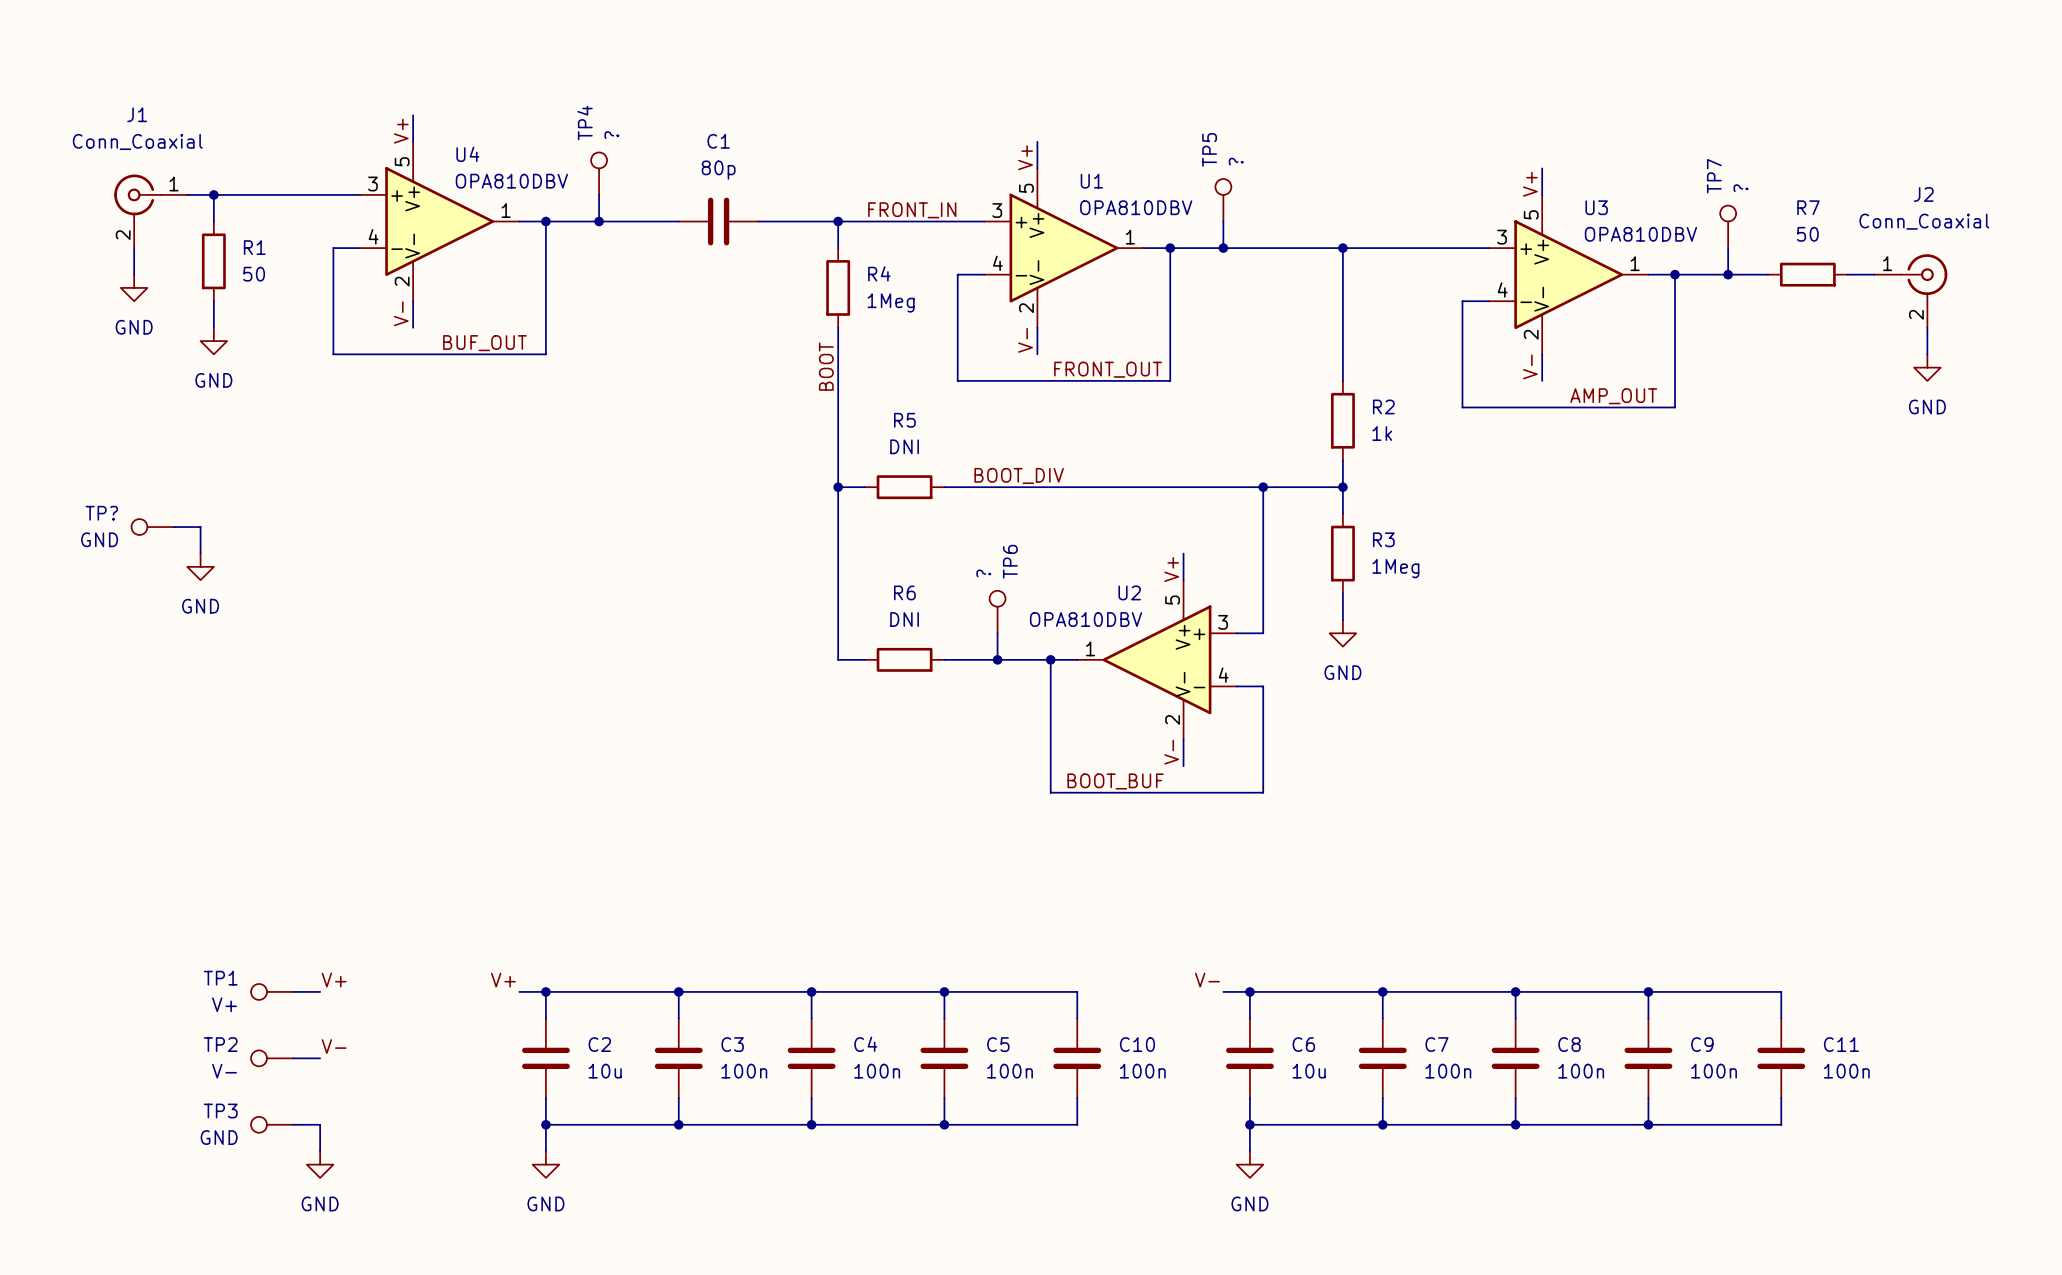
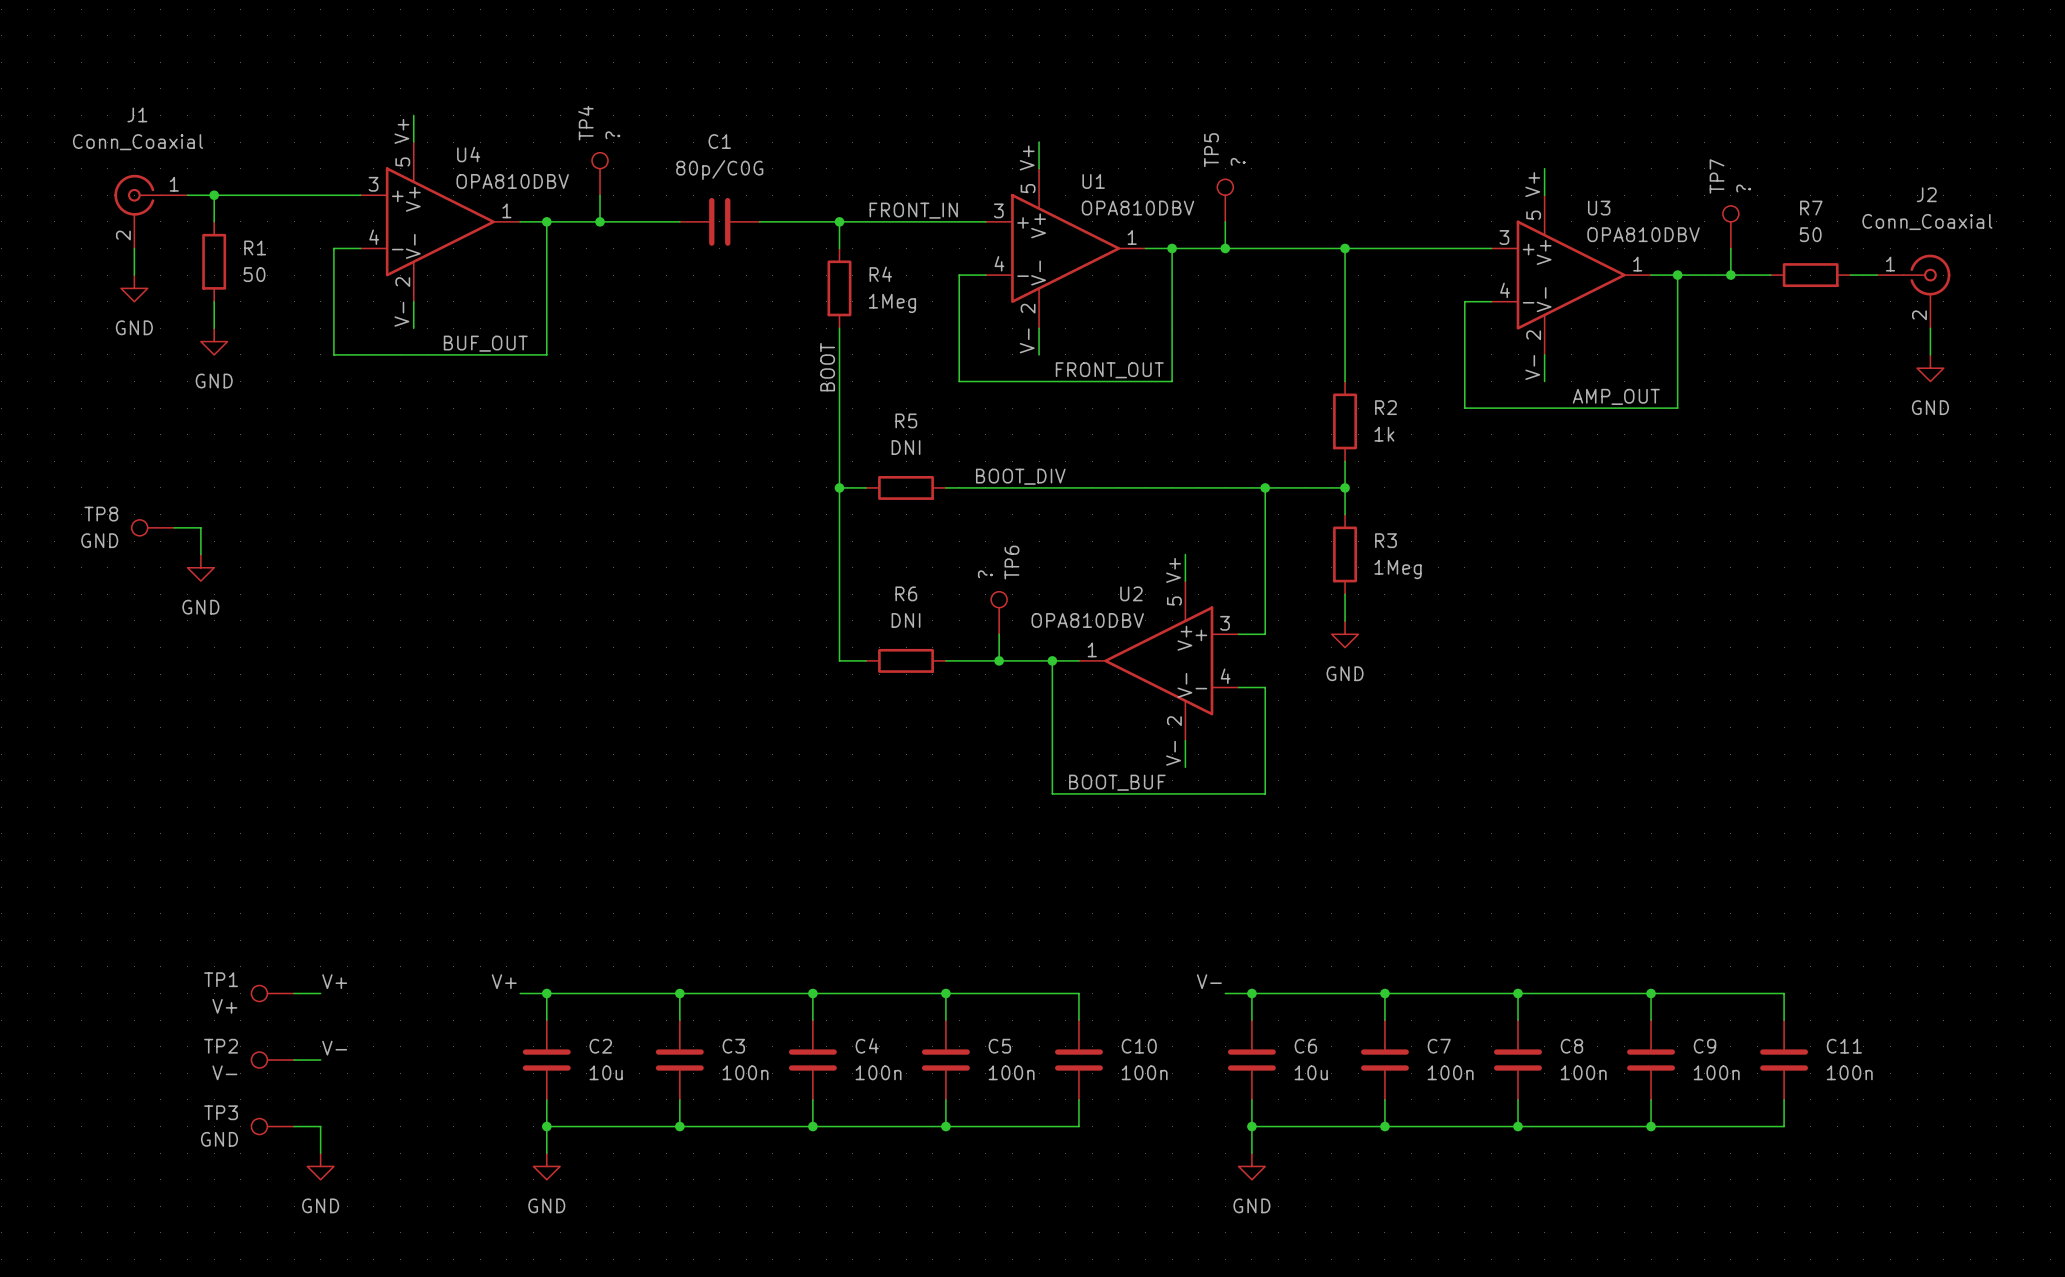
C1 value: 80p (718, 170) -> 80p/C0G (719, 170)
TP? name: TP? (101, 513) -> TP8 (101, 514)

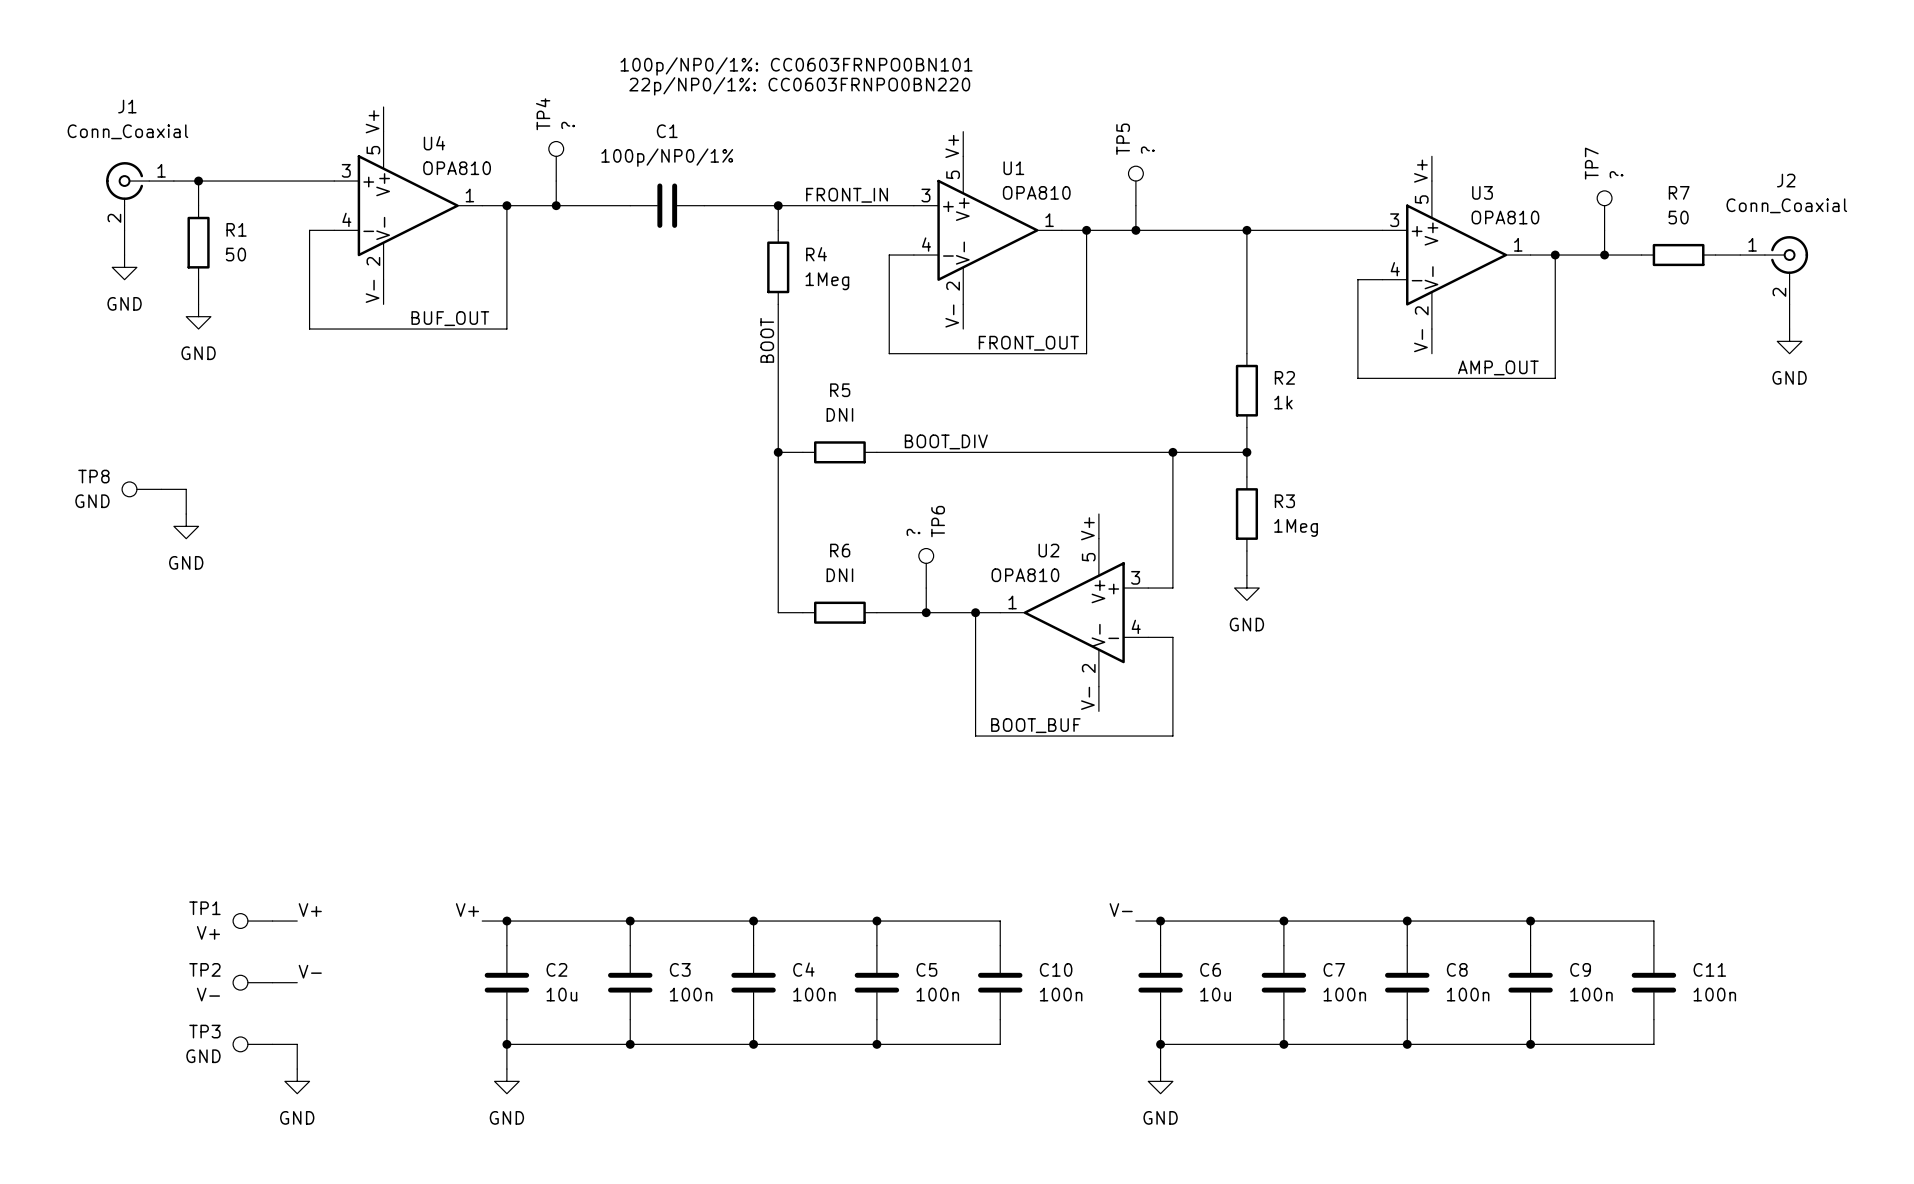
text: none -> 100p/NP0/1%: CC0603FRNPO0BN101 (796, 66)
text: none -> 22p/NP0/1%: CC0603FRNPO0BN220 (799, 86)
C1 value: 80p/C0G (719, 170) -> 100p/NP0/1% (667, 157)
U4 value: OPA810DBV (512, 181) -> OPA810 (457, 168)
U1 value: OPA810DBV (1137, 208) -> OPA810 (1036, 192)
U3 value: OPA810DBV (1643, 234) -> OPA810 (1505, 217)
U2 value: OPA810DBV (1087, 620) -> OPA810 (1025, 575)

